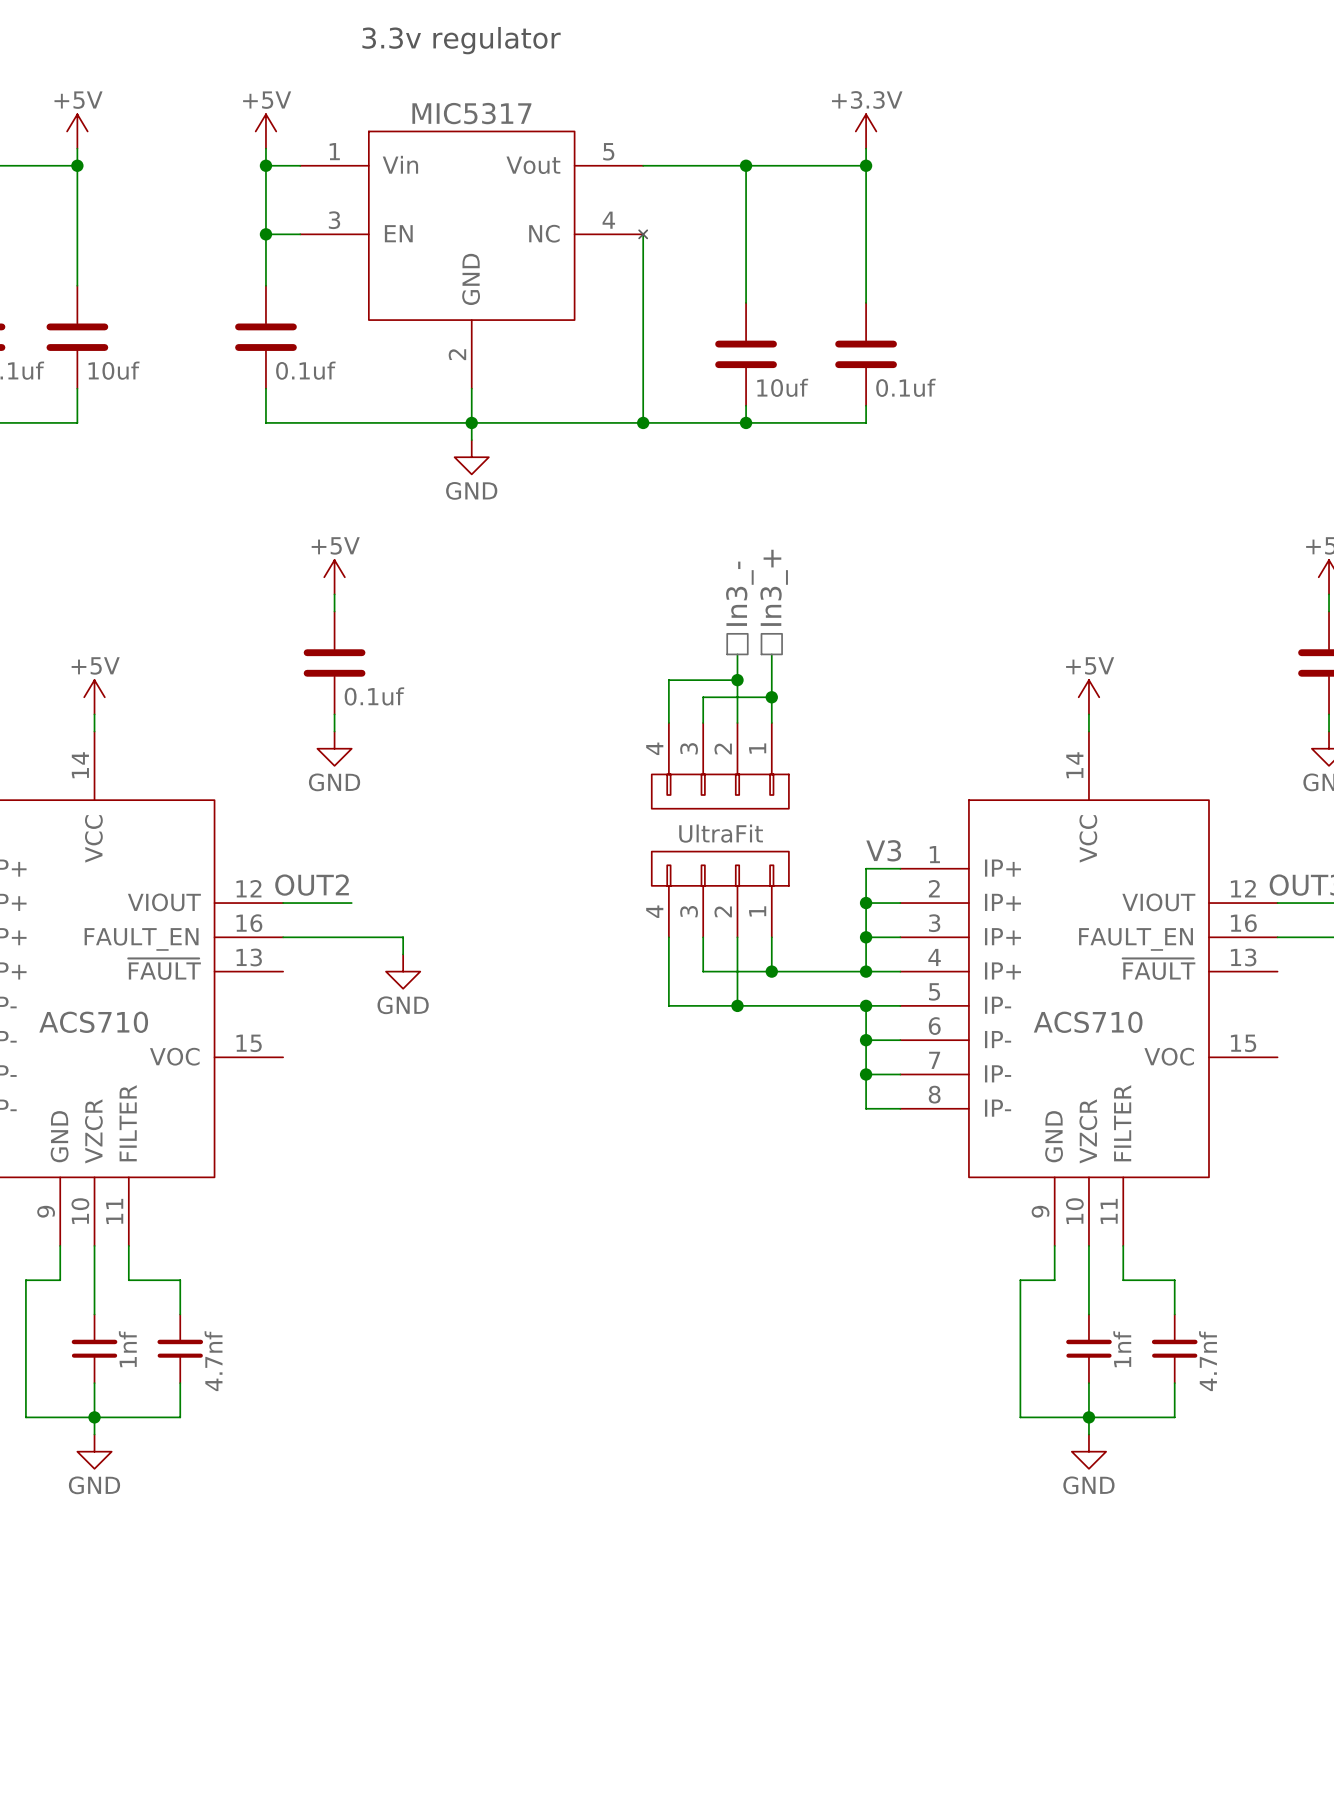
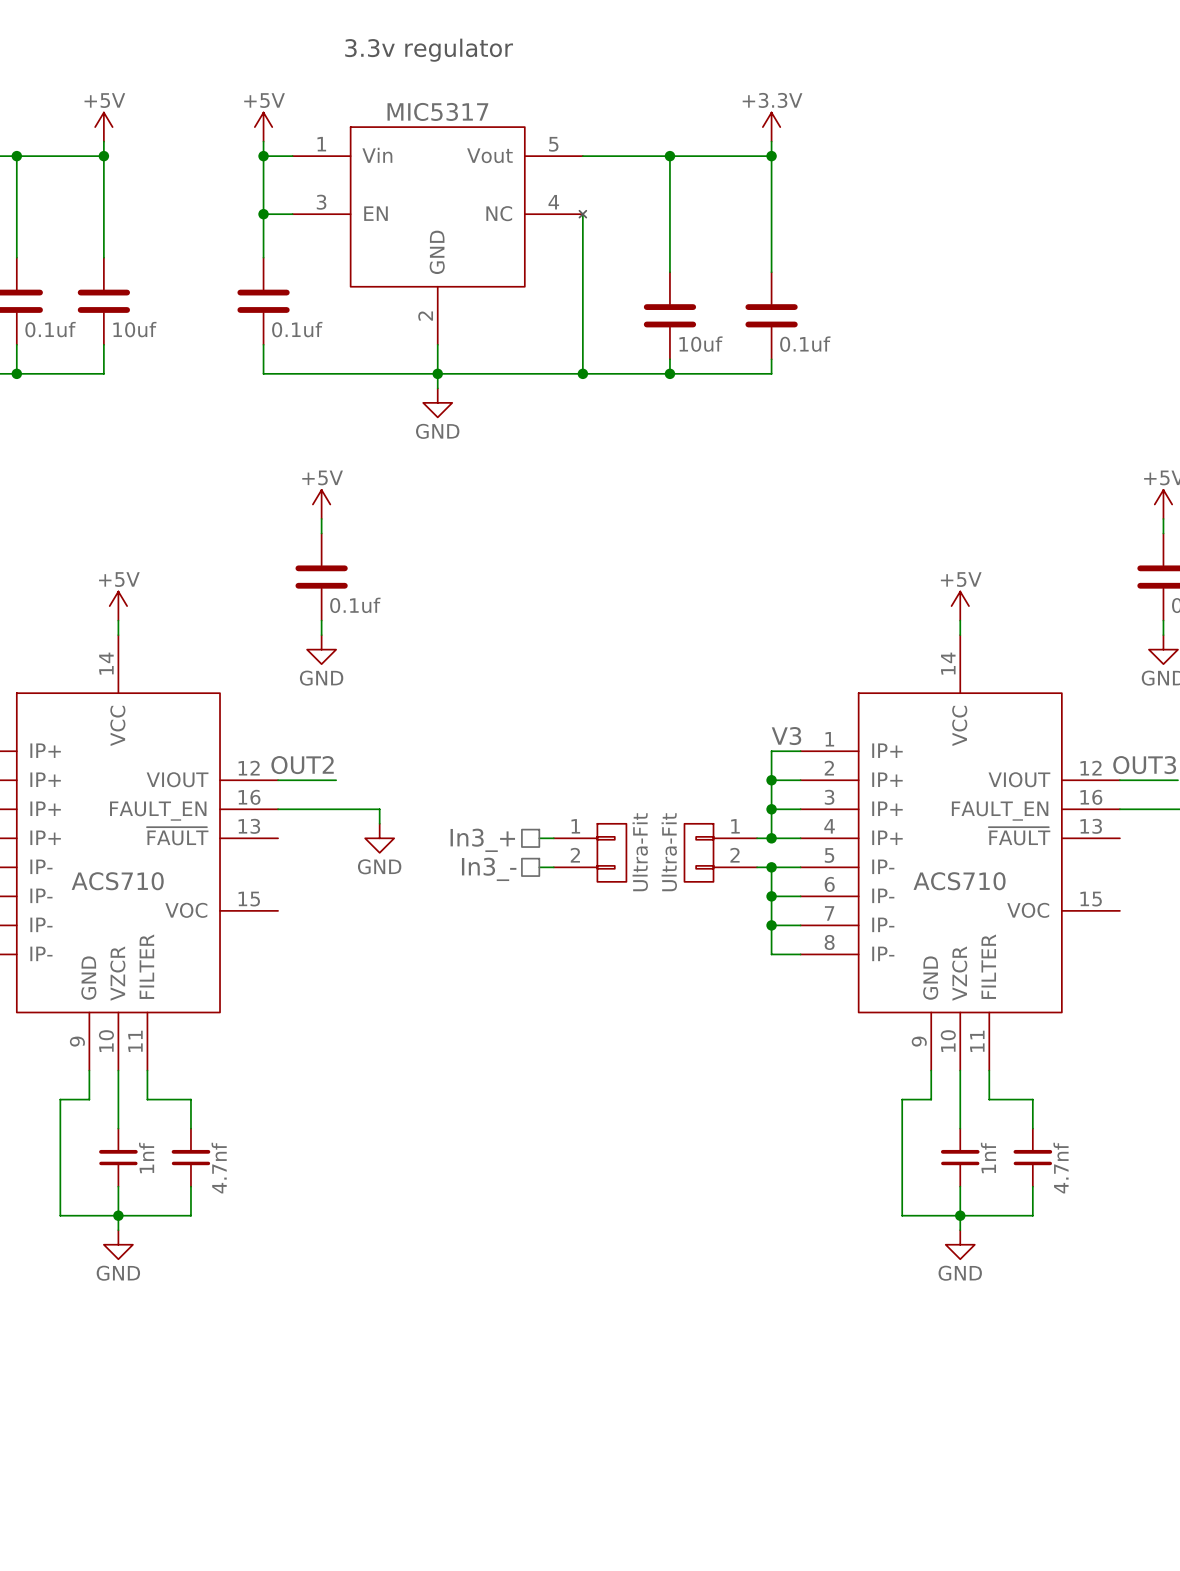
hierarchical label: In3_+ (774, 587) -> none
hierarchical label: In3_- (739, 593) -> none
wire: (737, 654) (737, 722) -> none
wire: (771, 654) (771, 722) -> none
wire: (737, 680) (668, 680) (668, 722) -> none
junction: (737, 680) -> none
wire: (771, 697) (703, 697) (703, 722) -> none
junction: (771, 697) -> none
part: (720, 765) -> none
part: UltraFit (720, 894) -> none
wire: (668, 937) (668, 1005) (848, 1005) -> none
wire: (703, 937) (703, 971) (848, 971) -> none
wire: (737, 937) (737, 1005) -> none
wire: (771, 937) (771, 971) -> none
wire: none -> (539, 838) (553, 838)
junction: (771, 971) -> none
hierarchical label: none -> In3_+ (482, 840)
part: none -> Ultra-Fit (590, 852)
part: none -> Ultra-Fit (720, 852)
wire: none -> (539, 867) (553, 867)
junction: (737, 1005) -> none
hierarchical label: none -> In3_- (489, 869)

